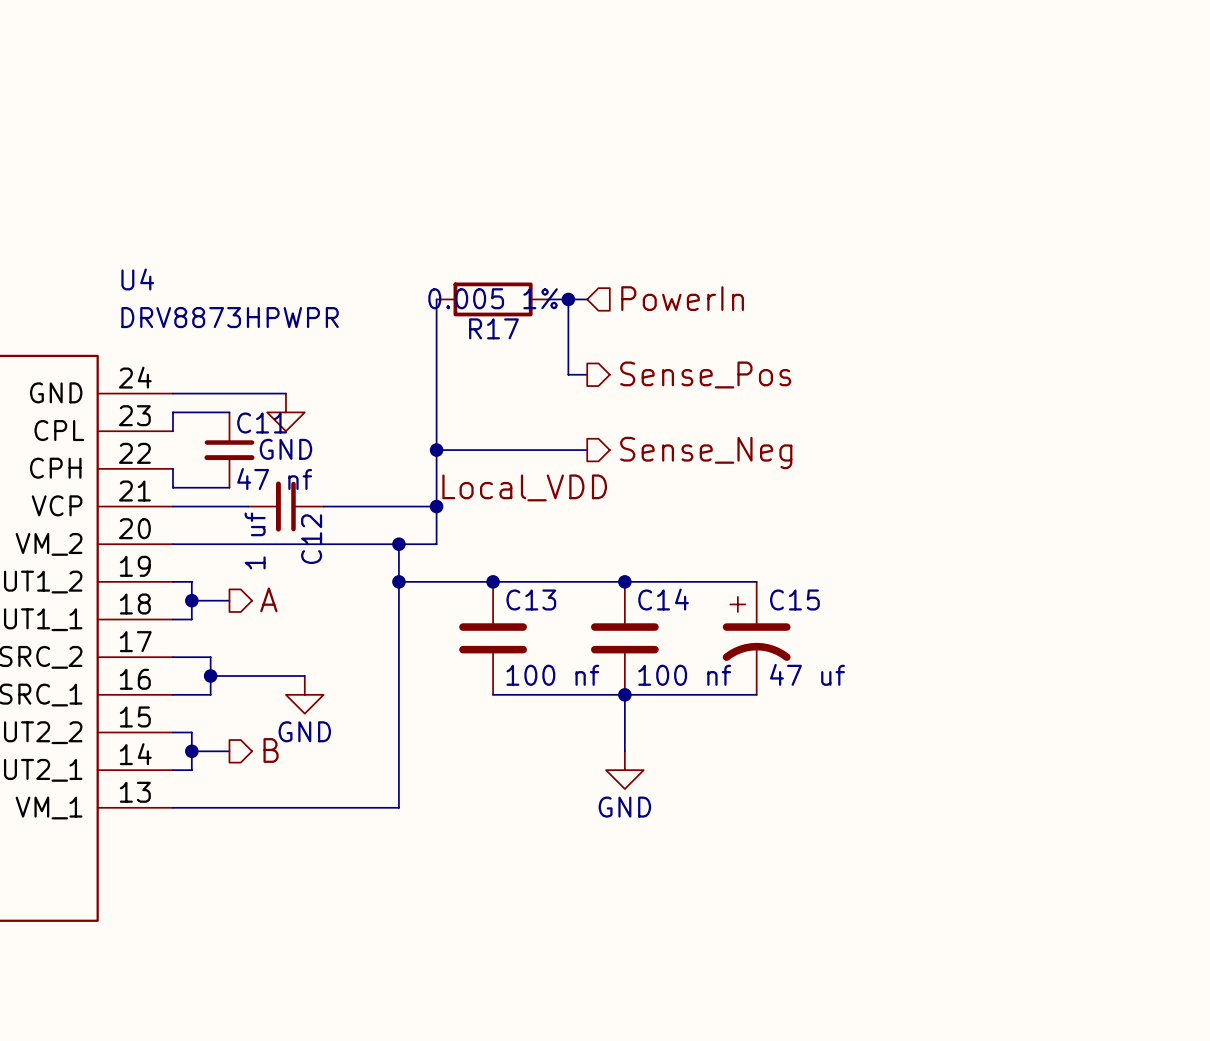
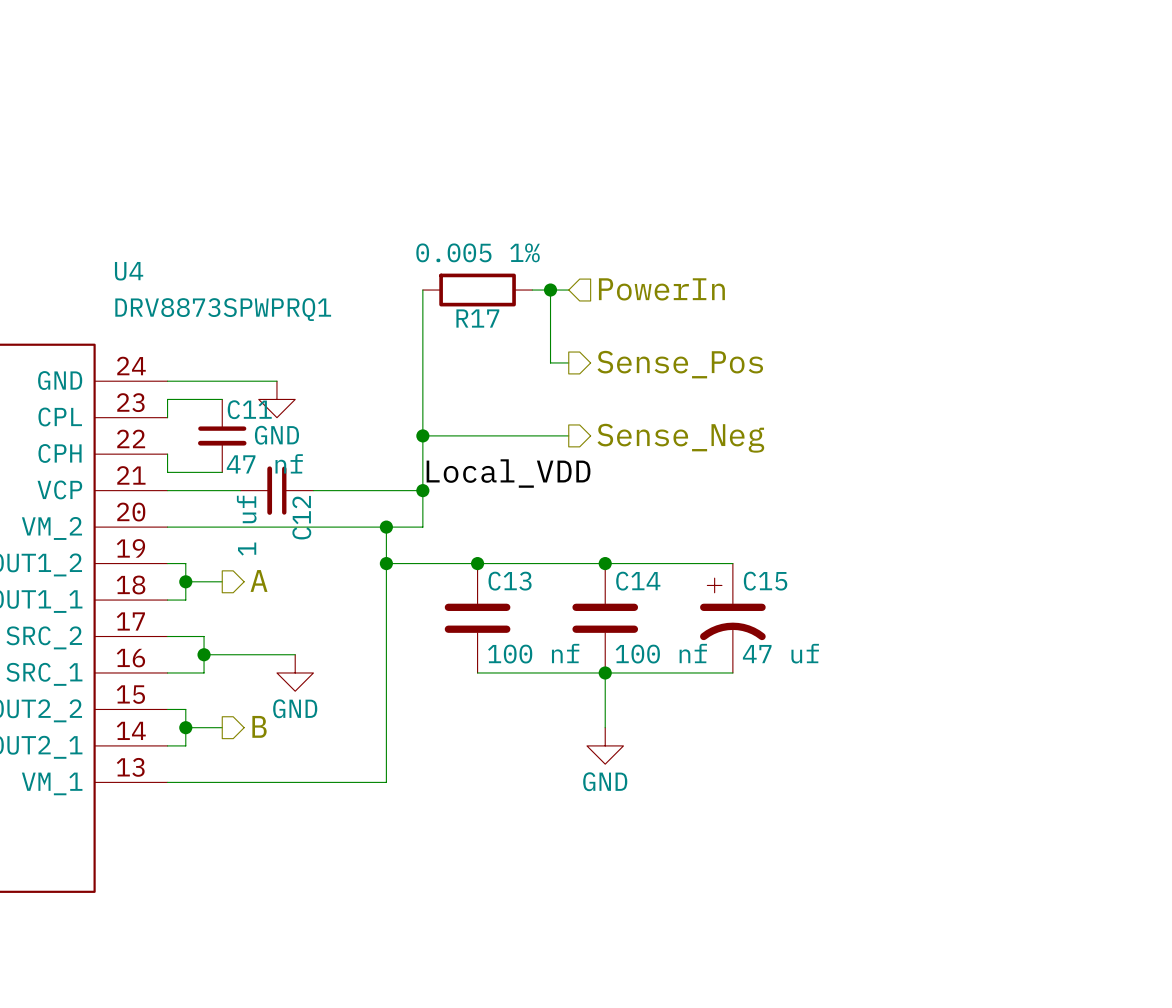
R17 value position: 0.005 1% (493, 298) -> 0.005 1% (478, 252)
U4 value: DRV8873HPWPR (230, 317) -> DRV8873SPWPRQ1 (223, 309)

